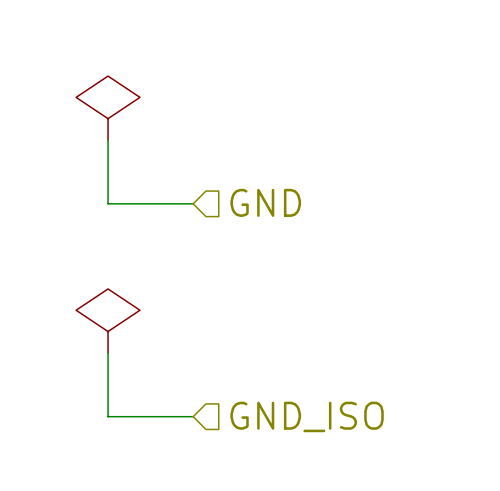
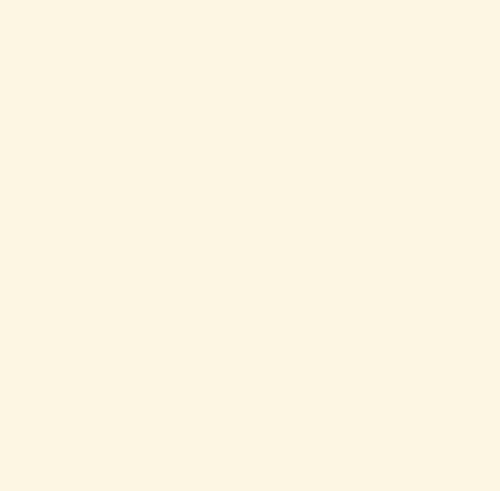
power symbol: (108, 108) -> none
wire: (108, 139) (108, 203) (193, 203) -> none
hierarchical label: GND (265, 202) -> none
power symbol: (108, 320) -> none
wire: (108, 352) (108, 416) (193, 416) -> none
hierarchical label: GND_ISO (307, 416) -> none

